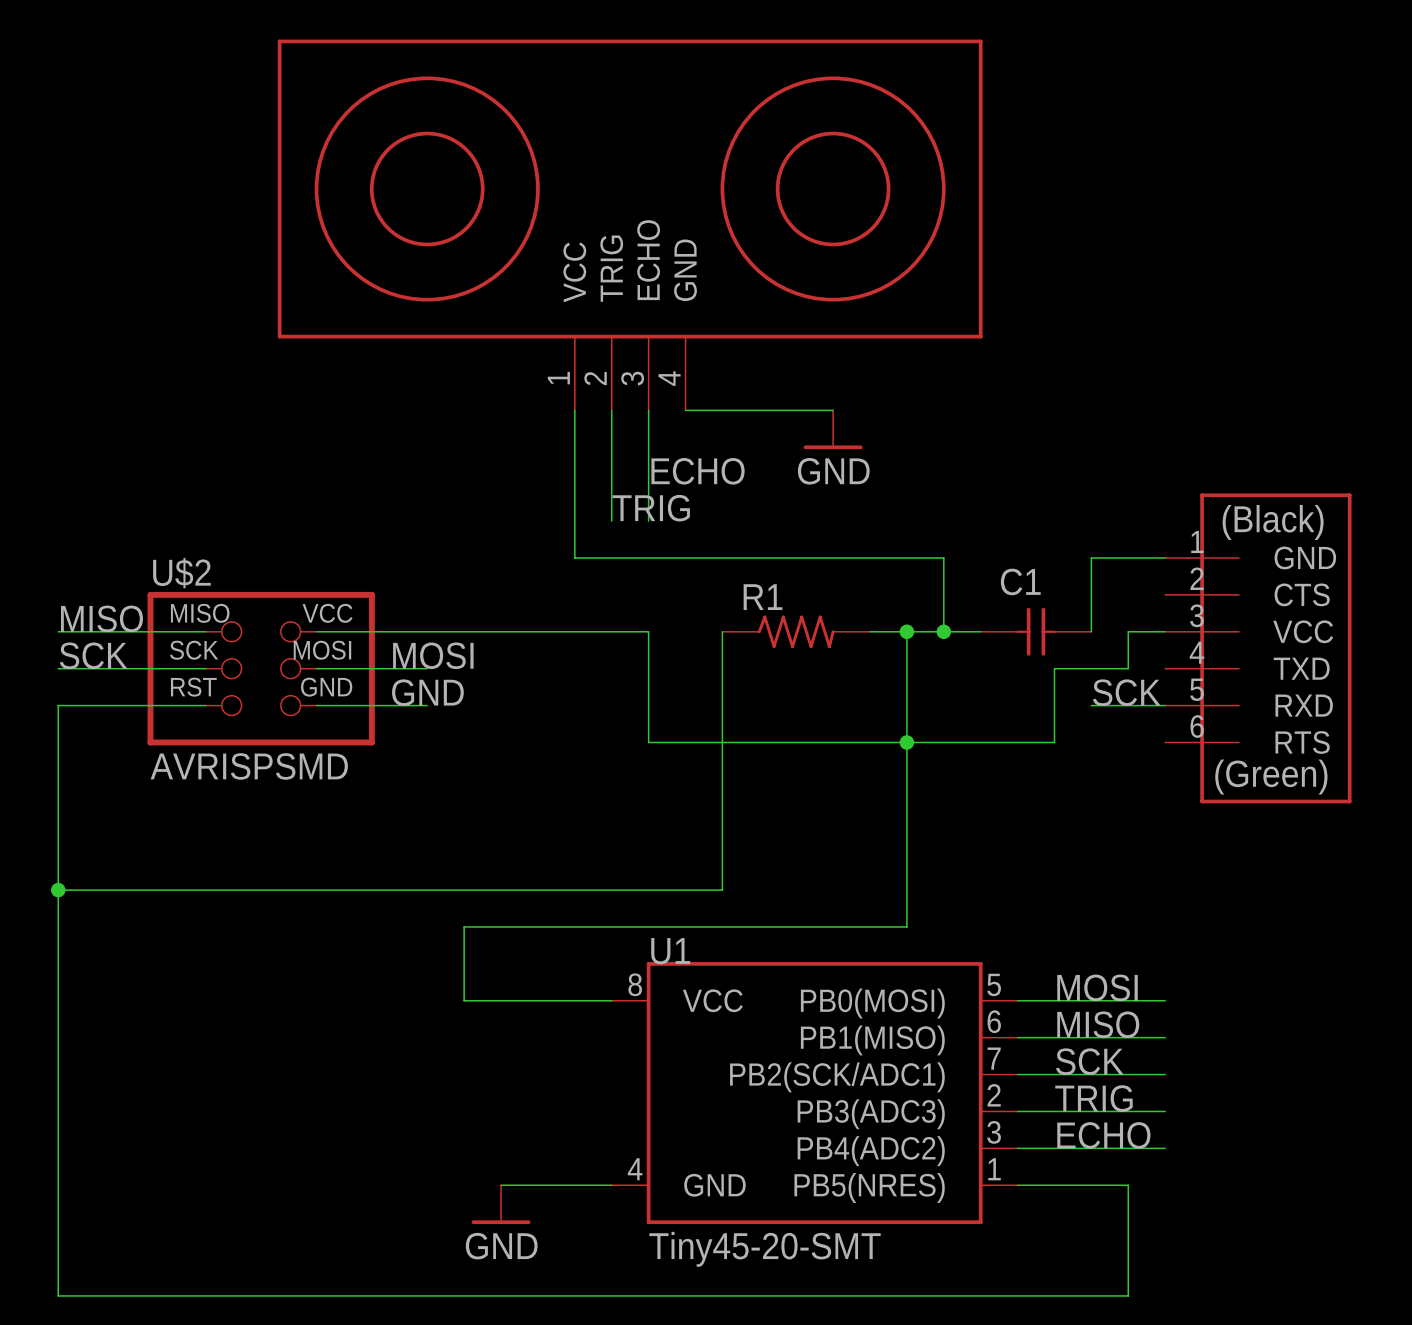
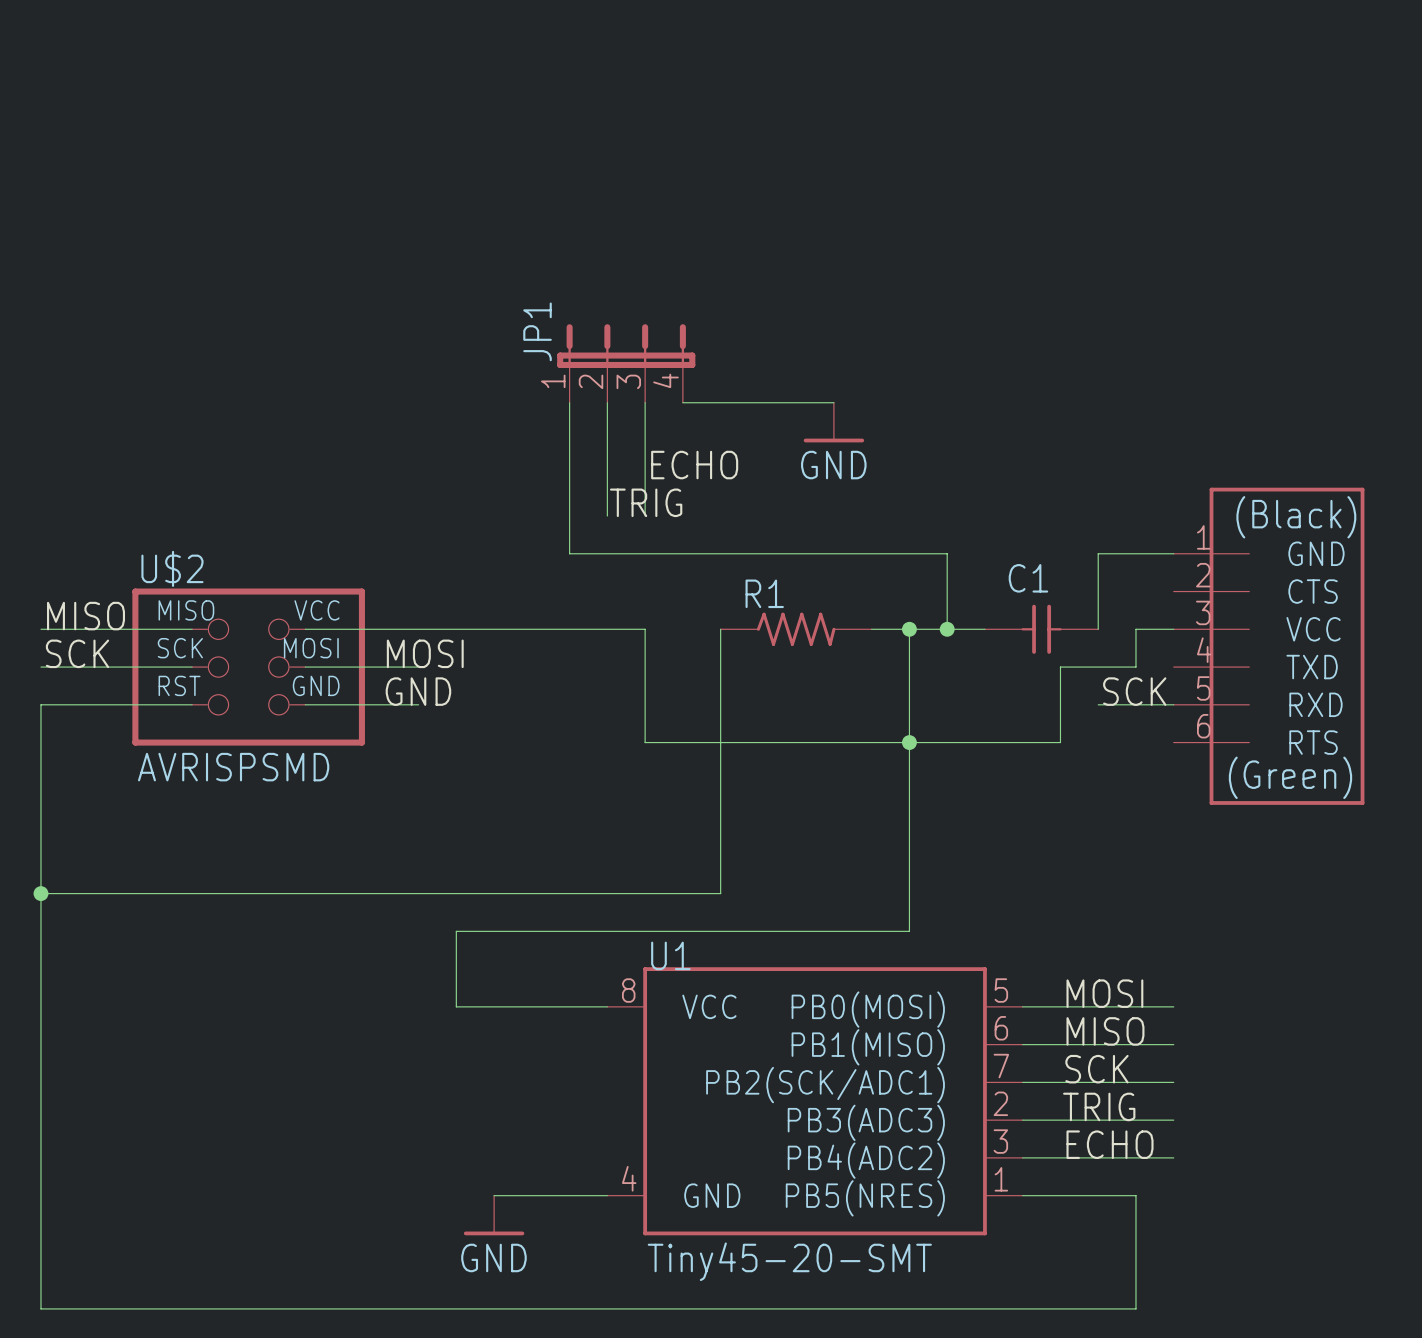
part: (630, 224) -> none
JP1: none -> (626, 363)

